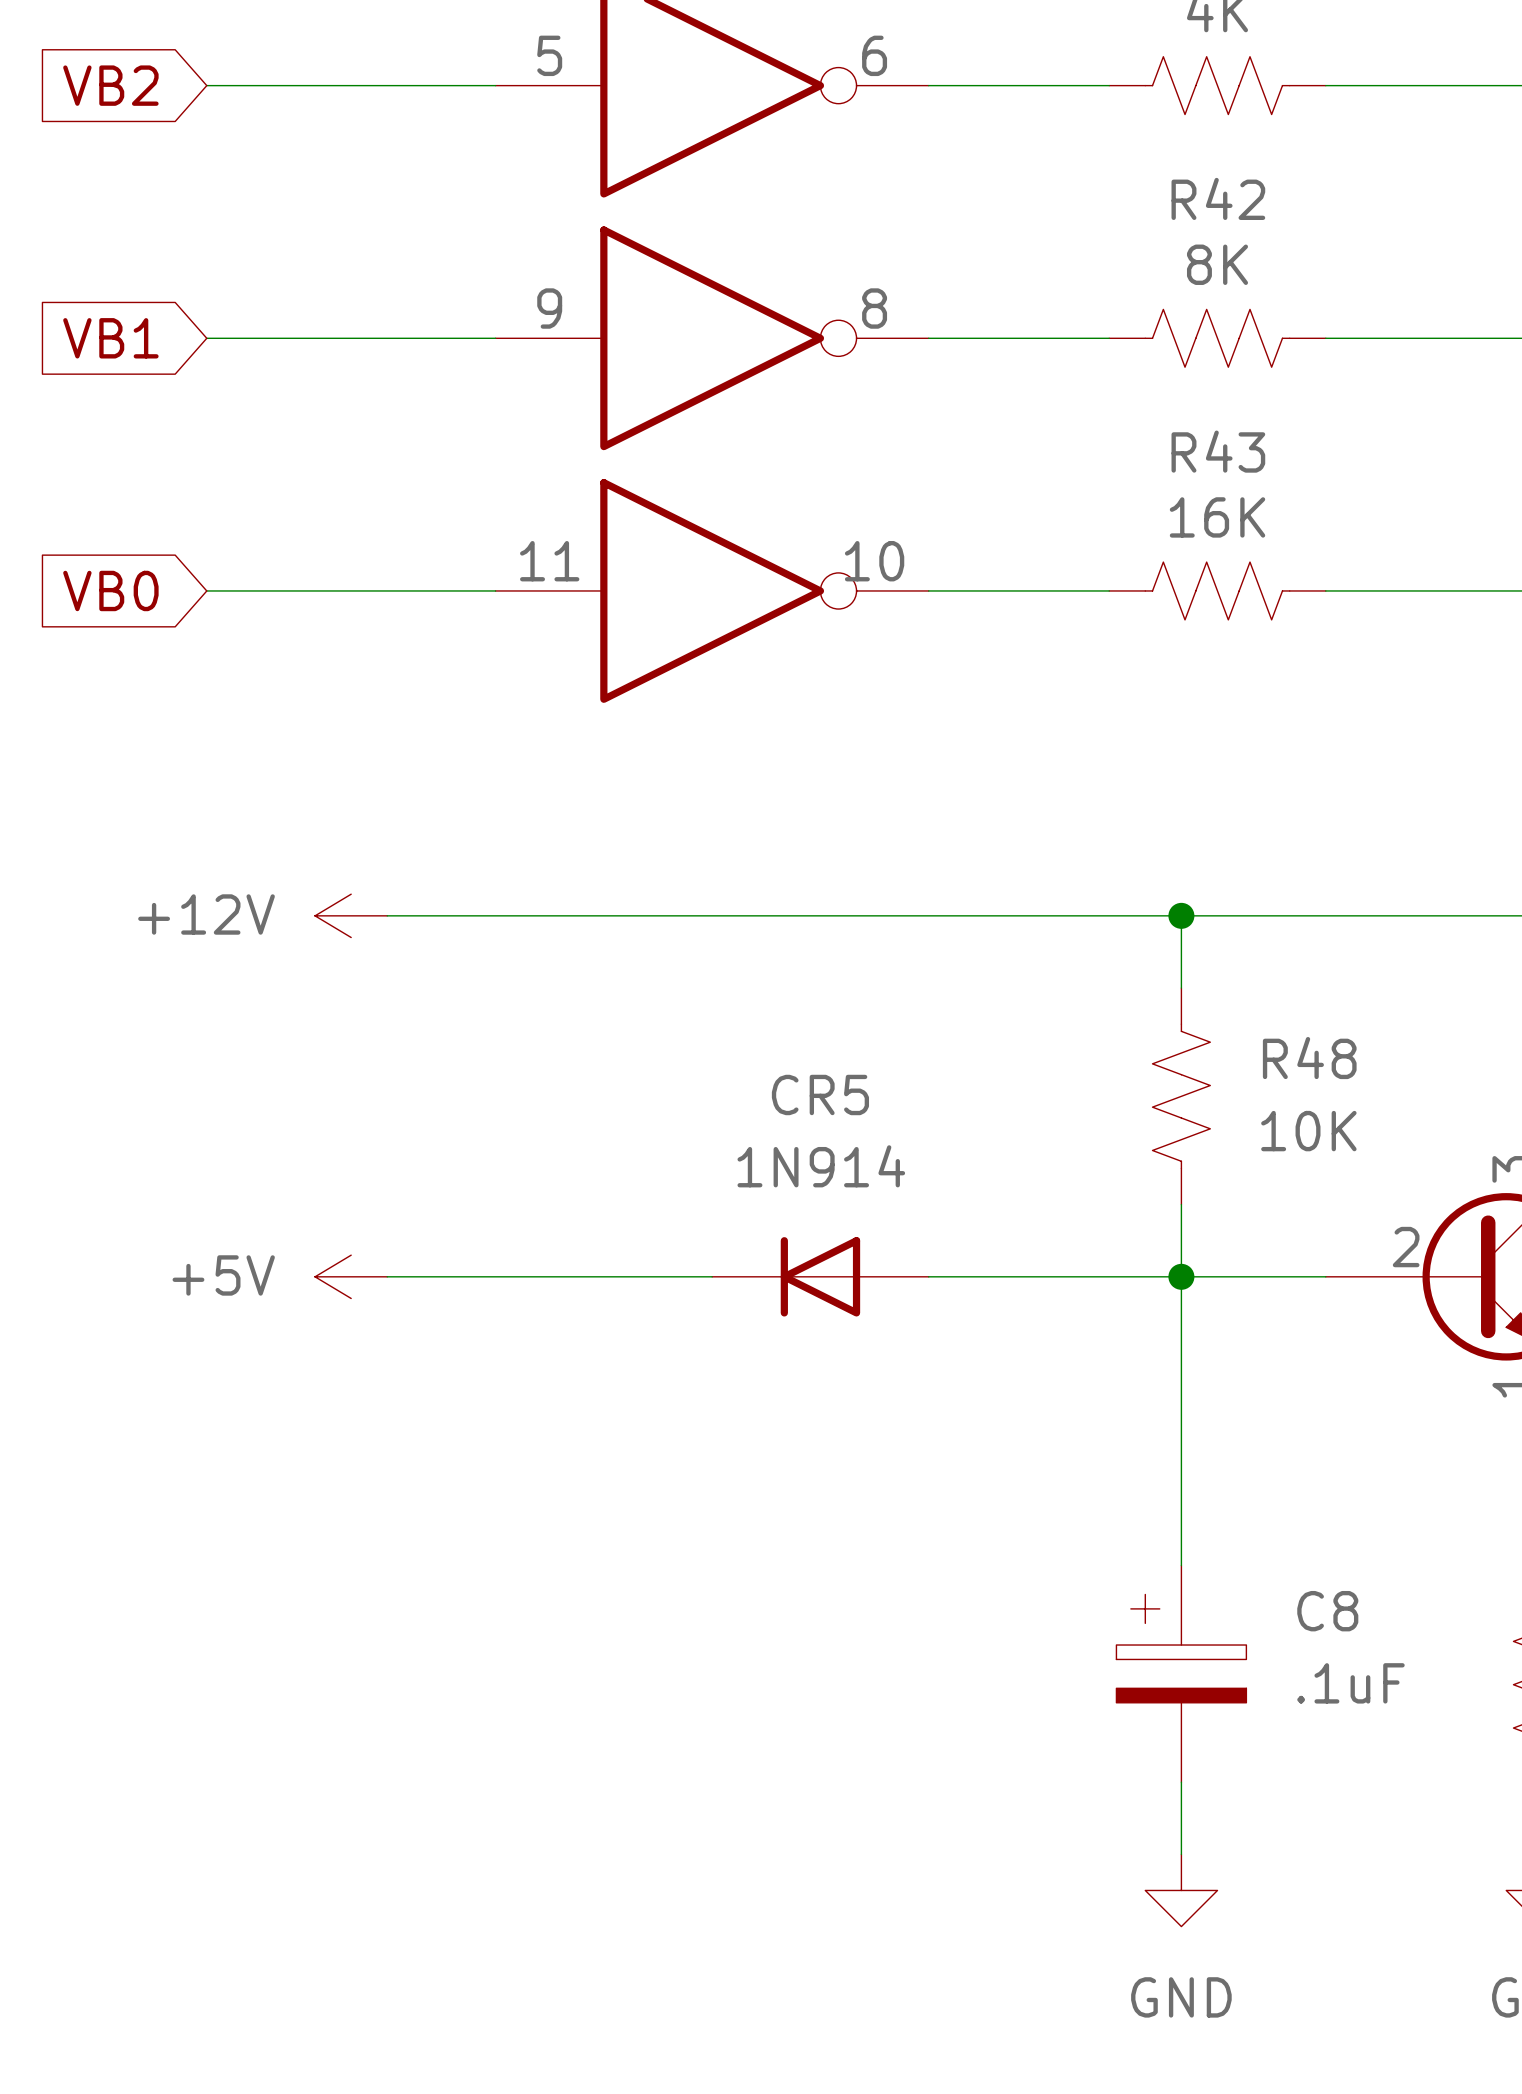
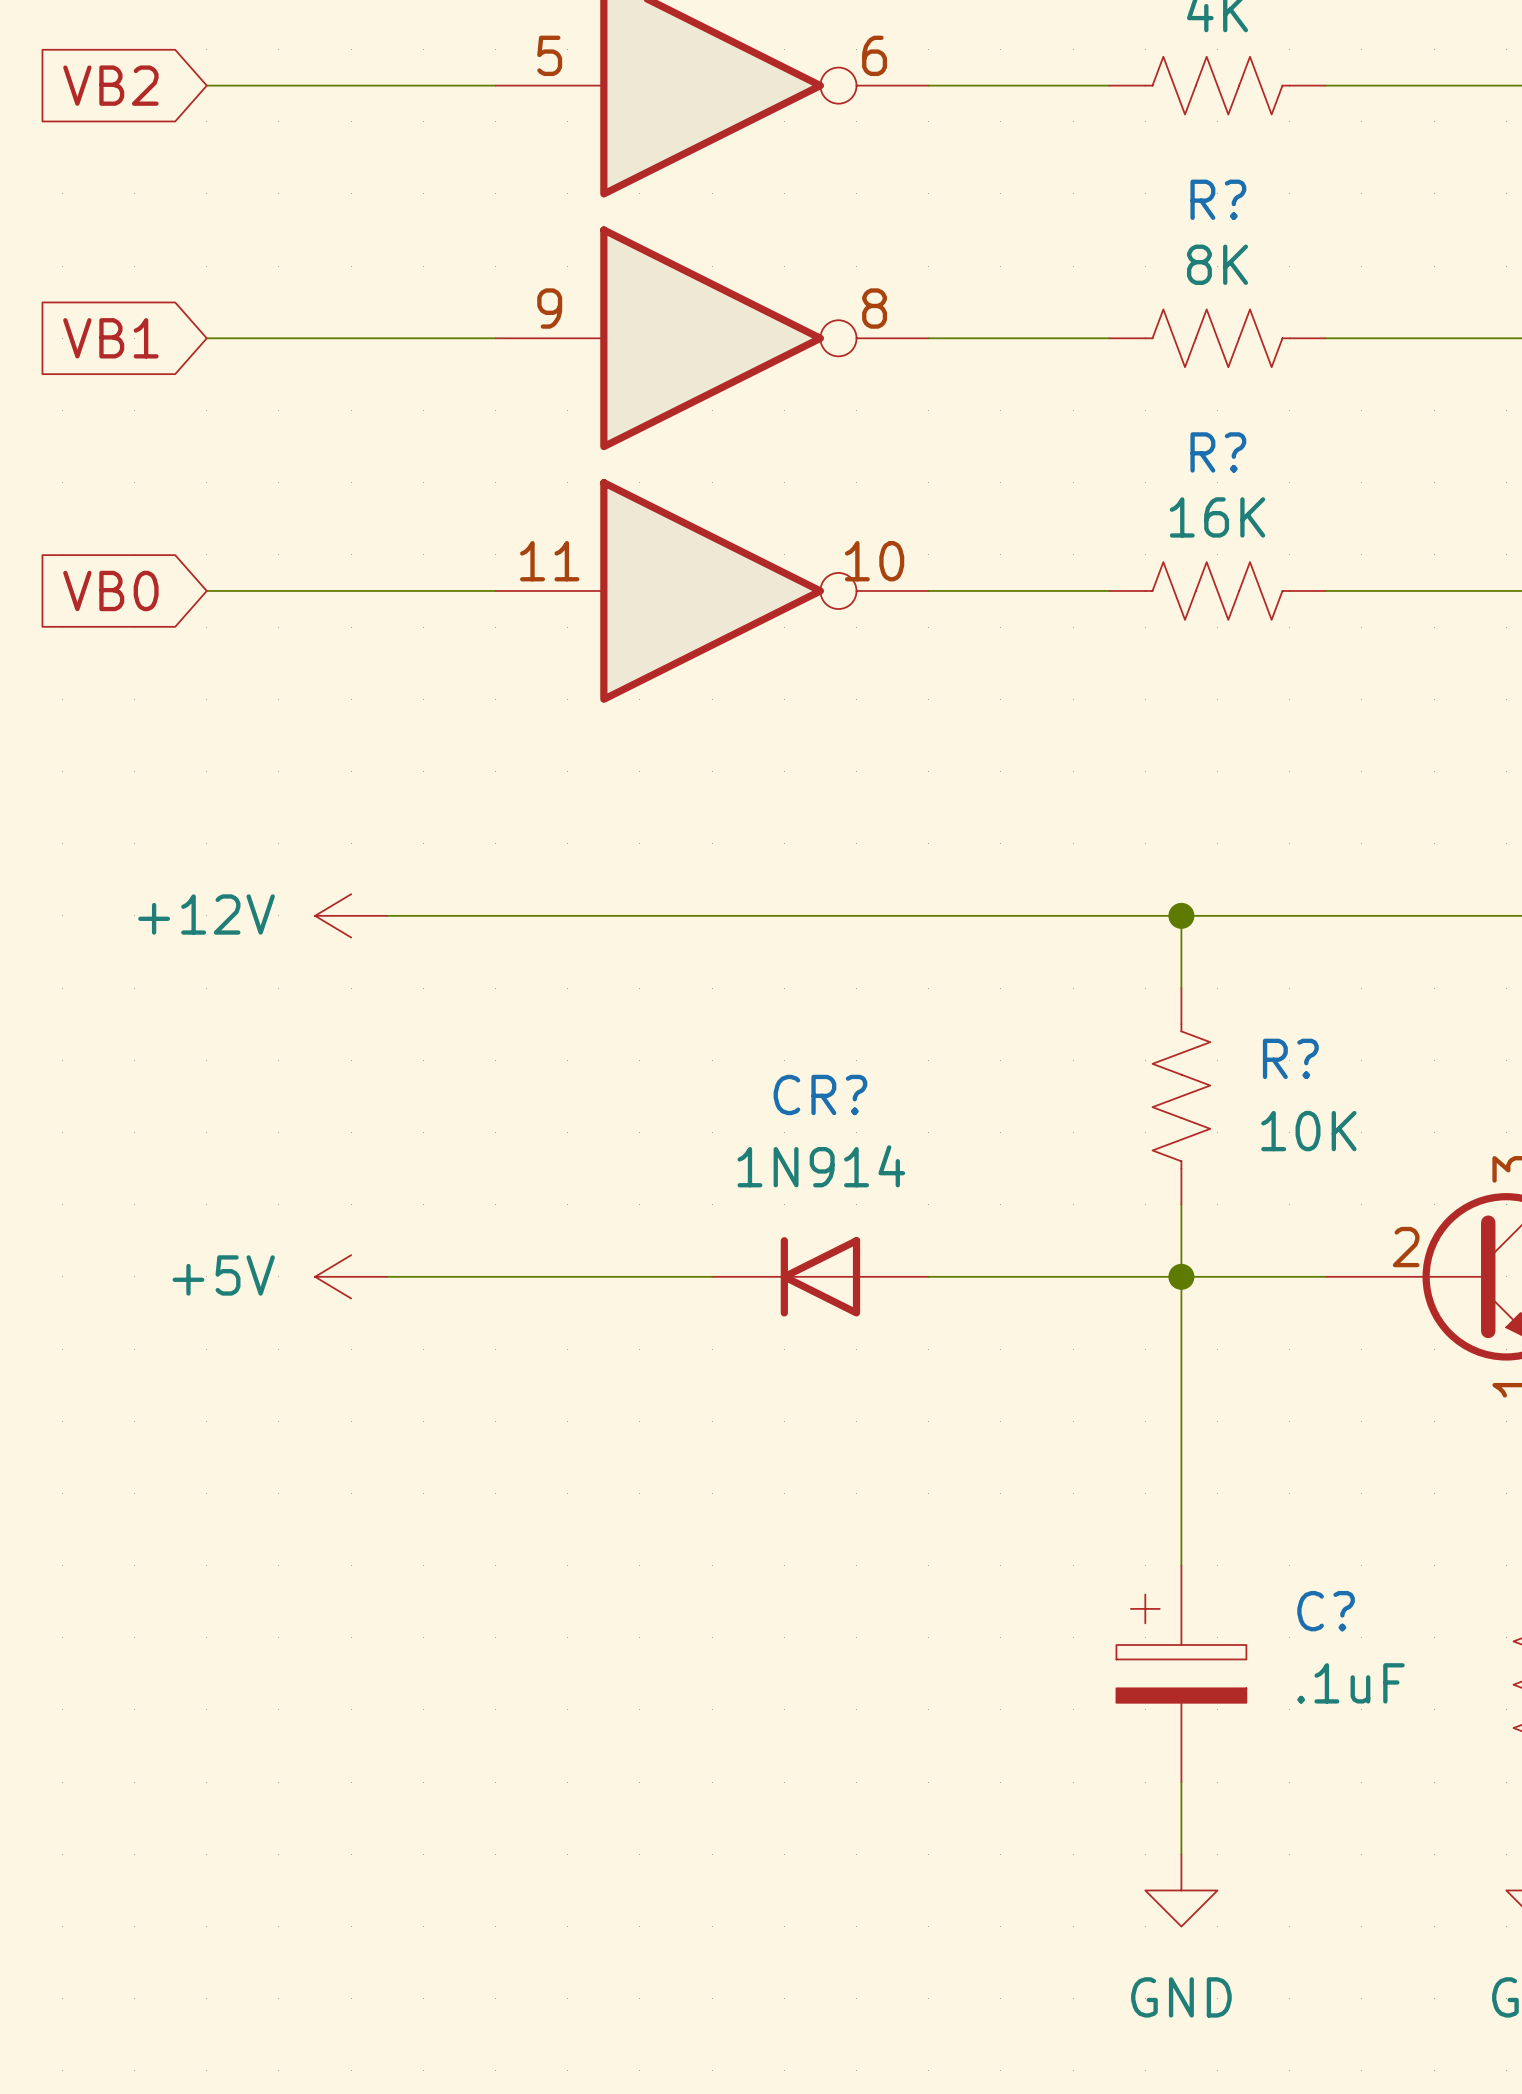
R42 name: R42 (1218, 198) -> R? (1218, 199)
R43 name: R43 (1218, 451) -> R? (1218, 452)
R48 name: R48 (1309, 1058) -> R? (1290, 1058)
CR5 name: CR5 (820, 1094) -> CR? (820, 1094)
C8 name: C8 (1327, 1611) -> C? (1326, 1611)

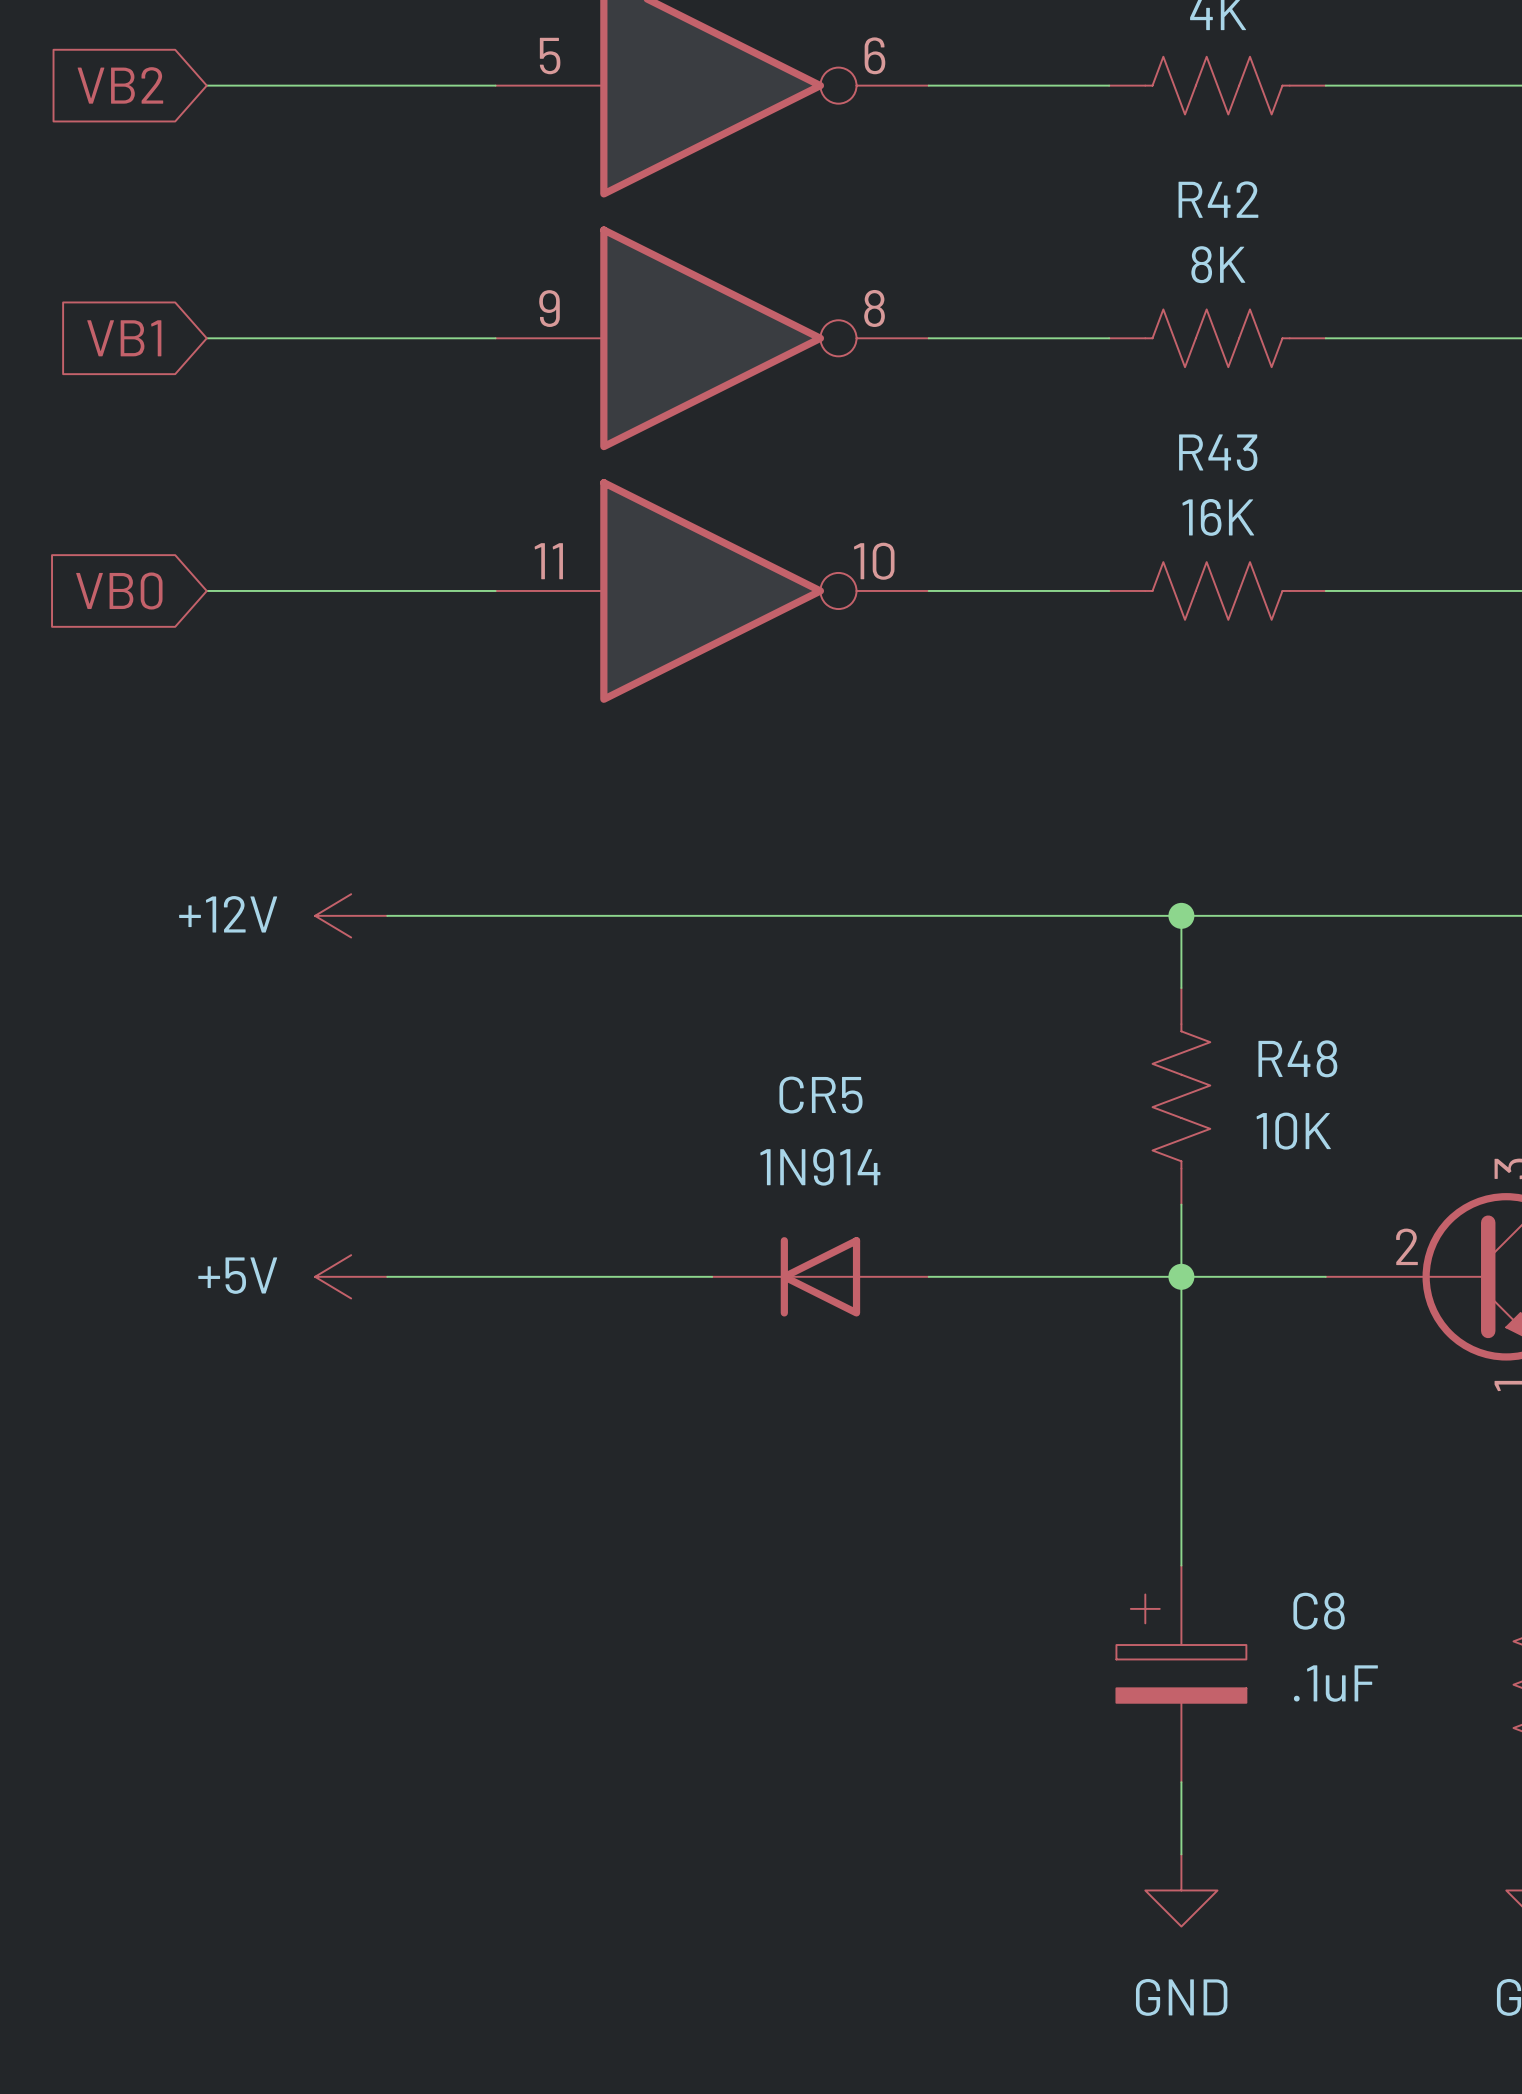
R? name: R? (1218, 199) -> R42 (1218, 199)
R? name: R? (1218, 452) -> R43 (1218, 452)
R? name: R? (1290, 1058) -> R48 (1297, 1058)
CR? name: CR? (820, 1094) -> CR5 (821, 1095)
C? name: C? (1326, 1611) -> C8 (1319, 1611)

